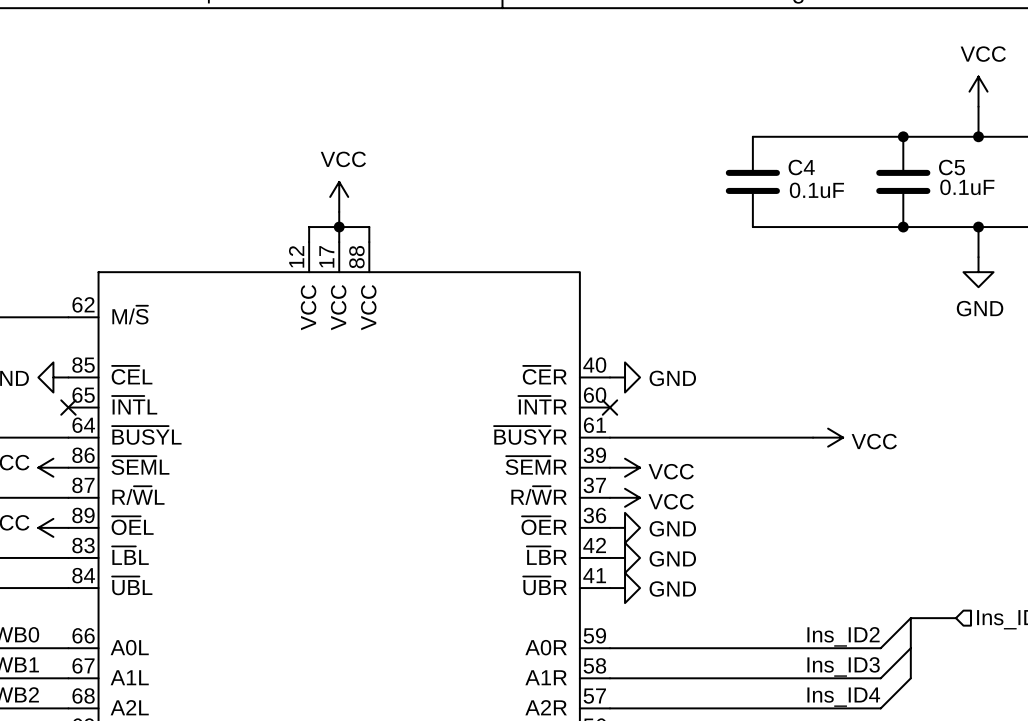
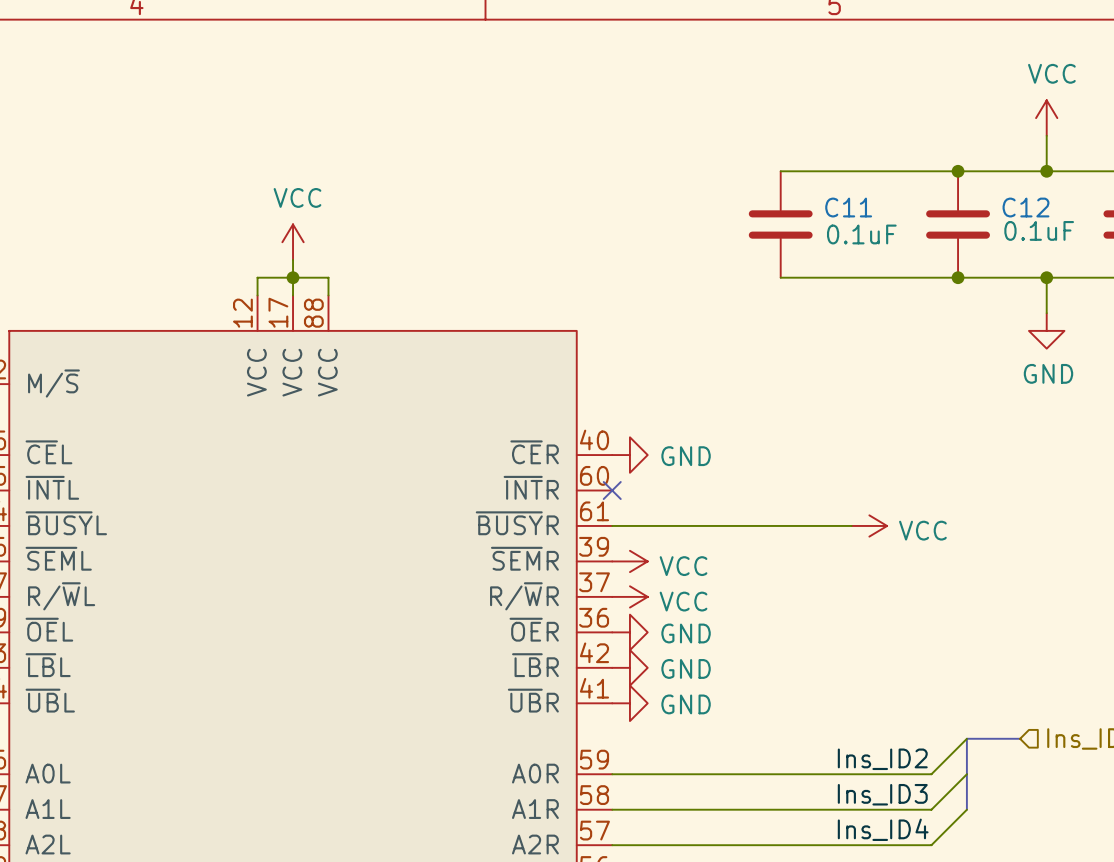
C4 name: C4 (801, 167) -> C11 (848, 207)
C5 name: C5 (951, 167) -> C12 (1025, 207)

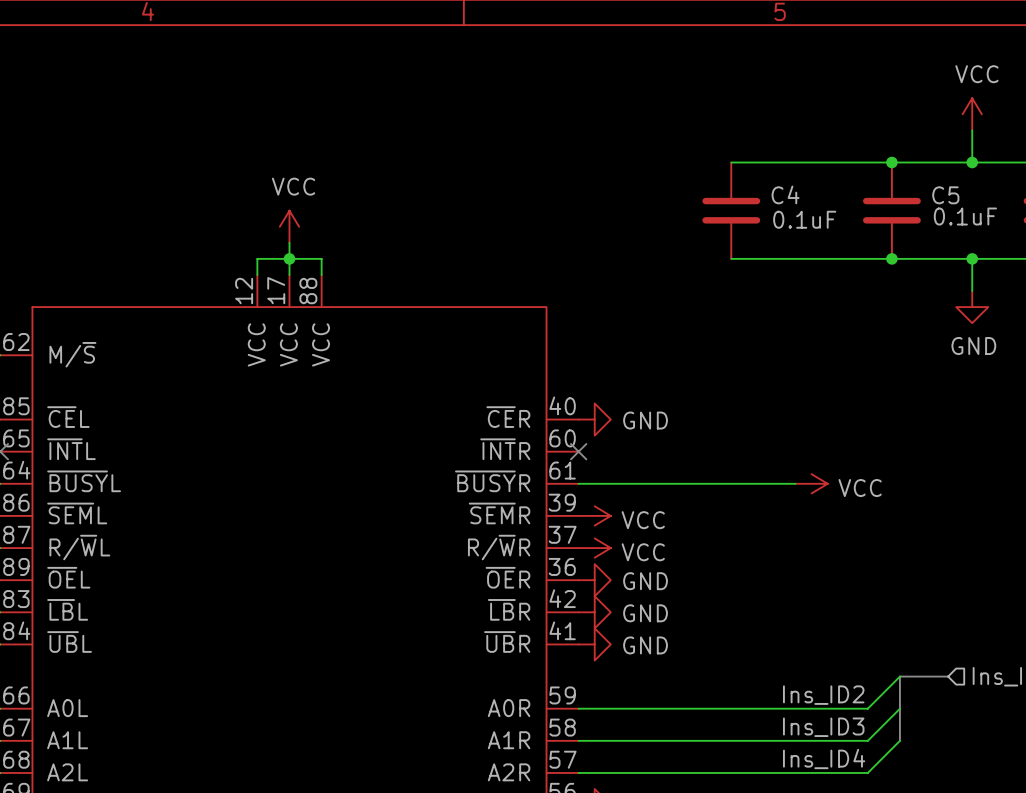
C11 name: C11 (848, 207) -> C4 (785, 194)
C12 name: C12 (1025, 207) -> C5 (945, 195)

